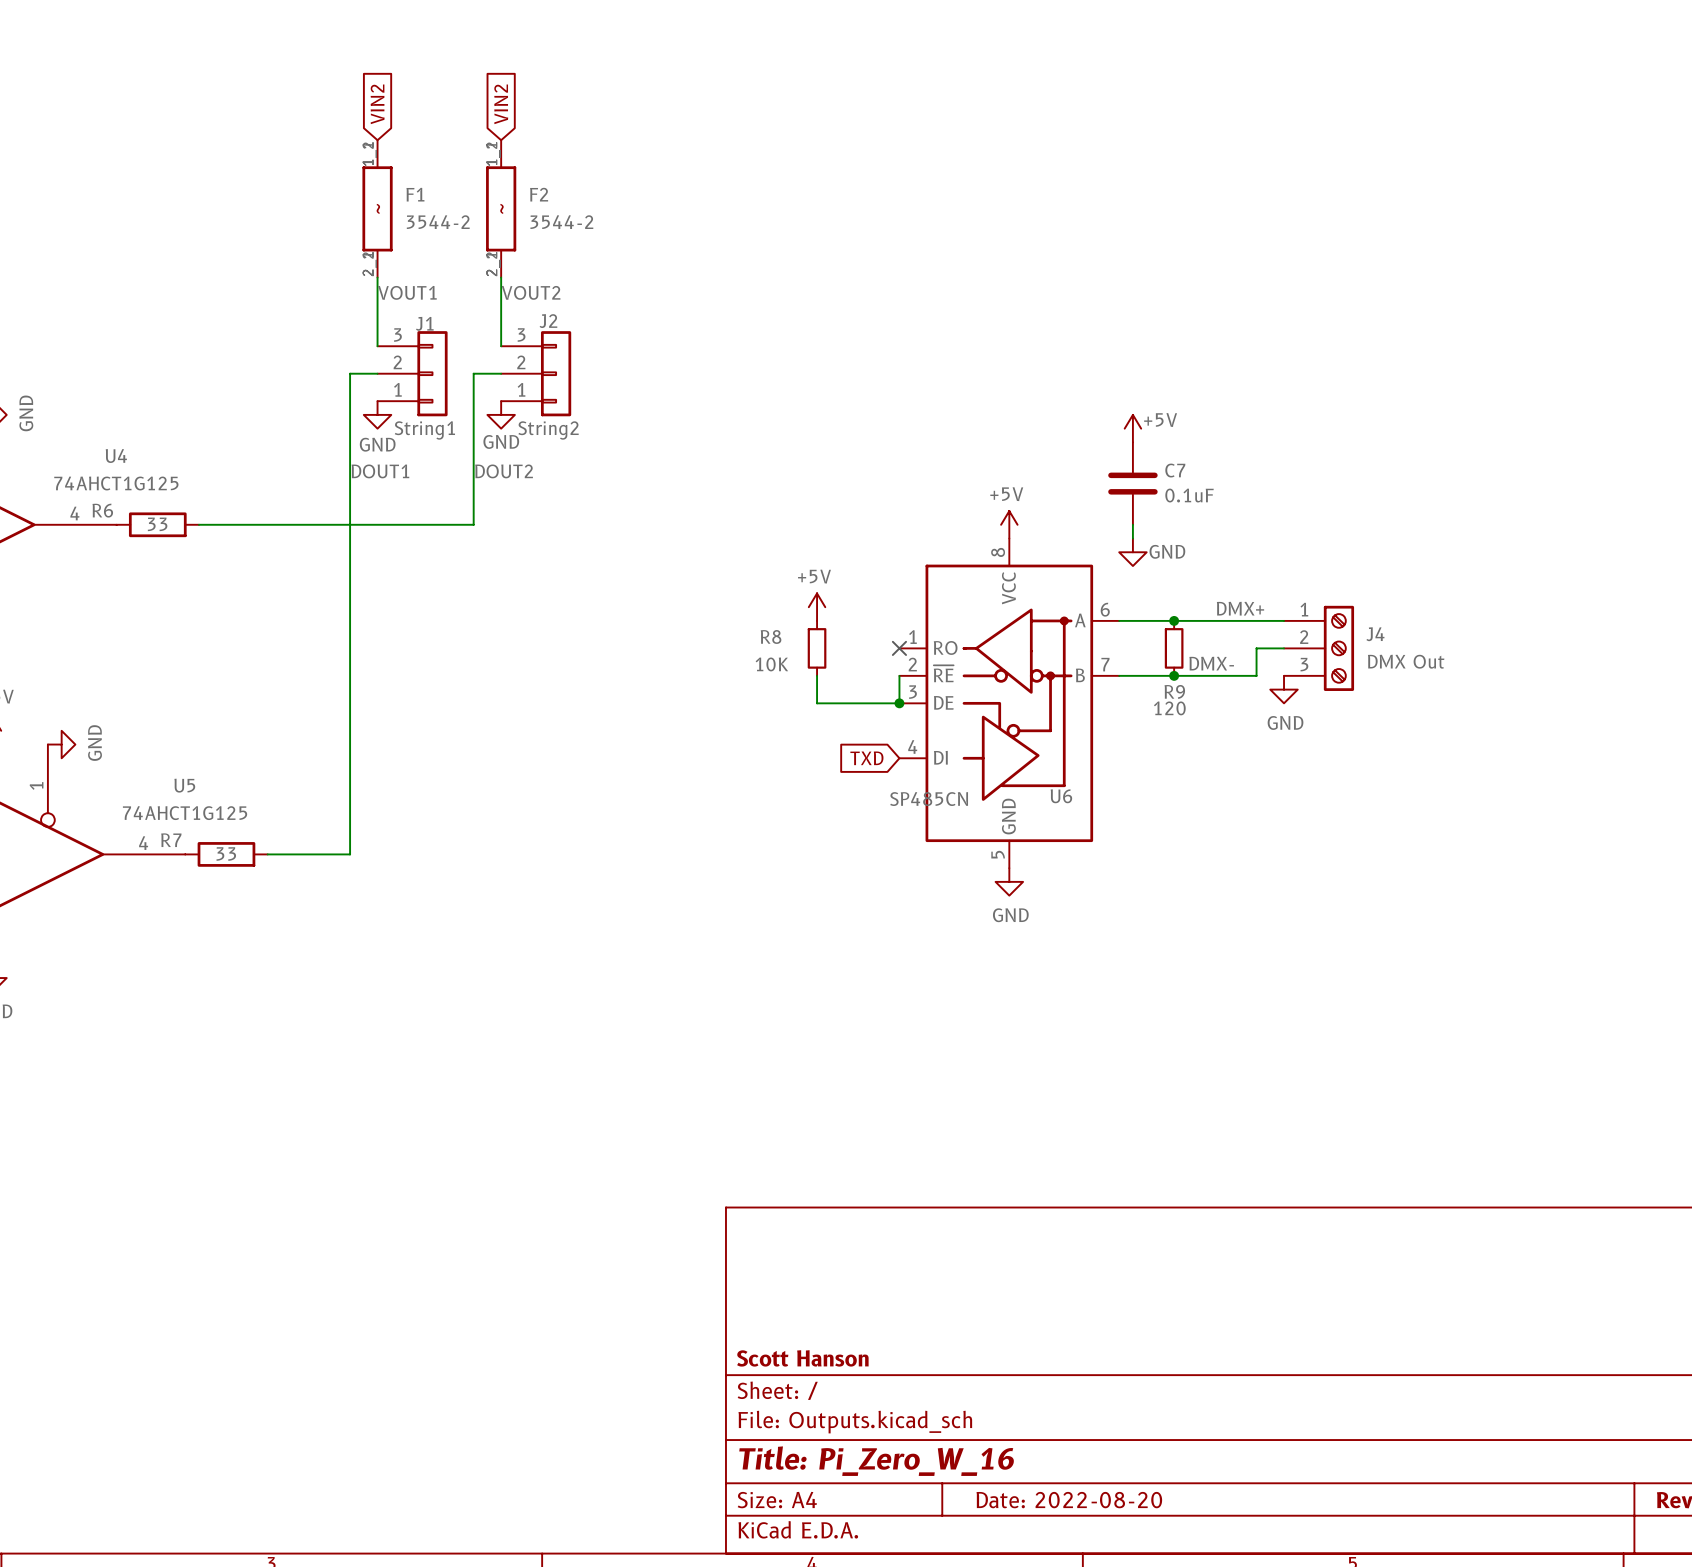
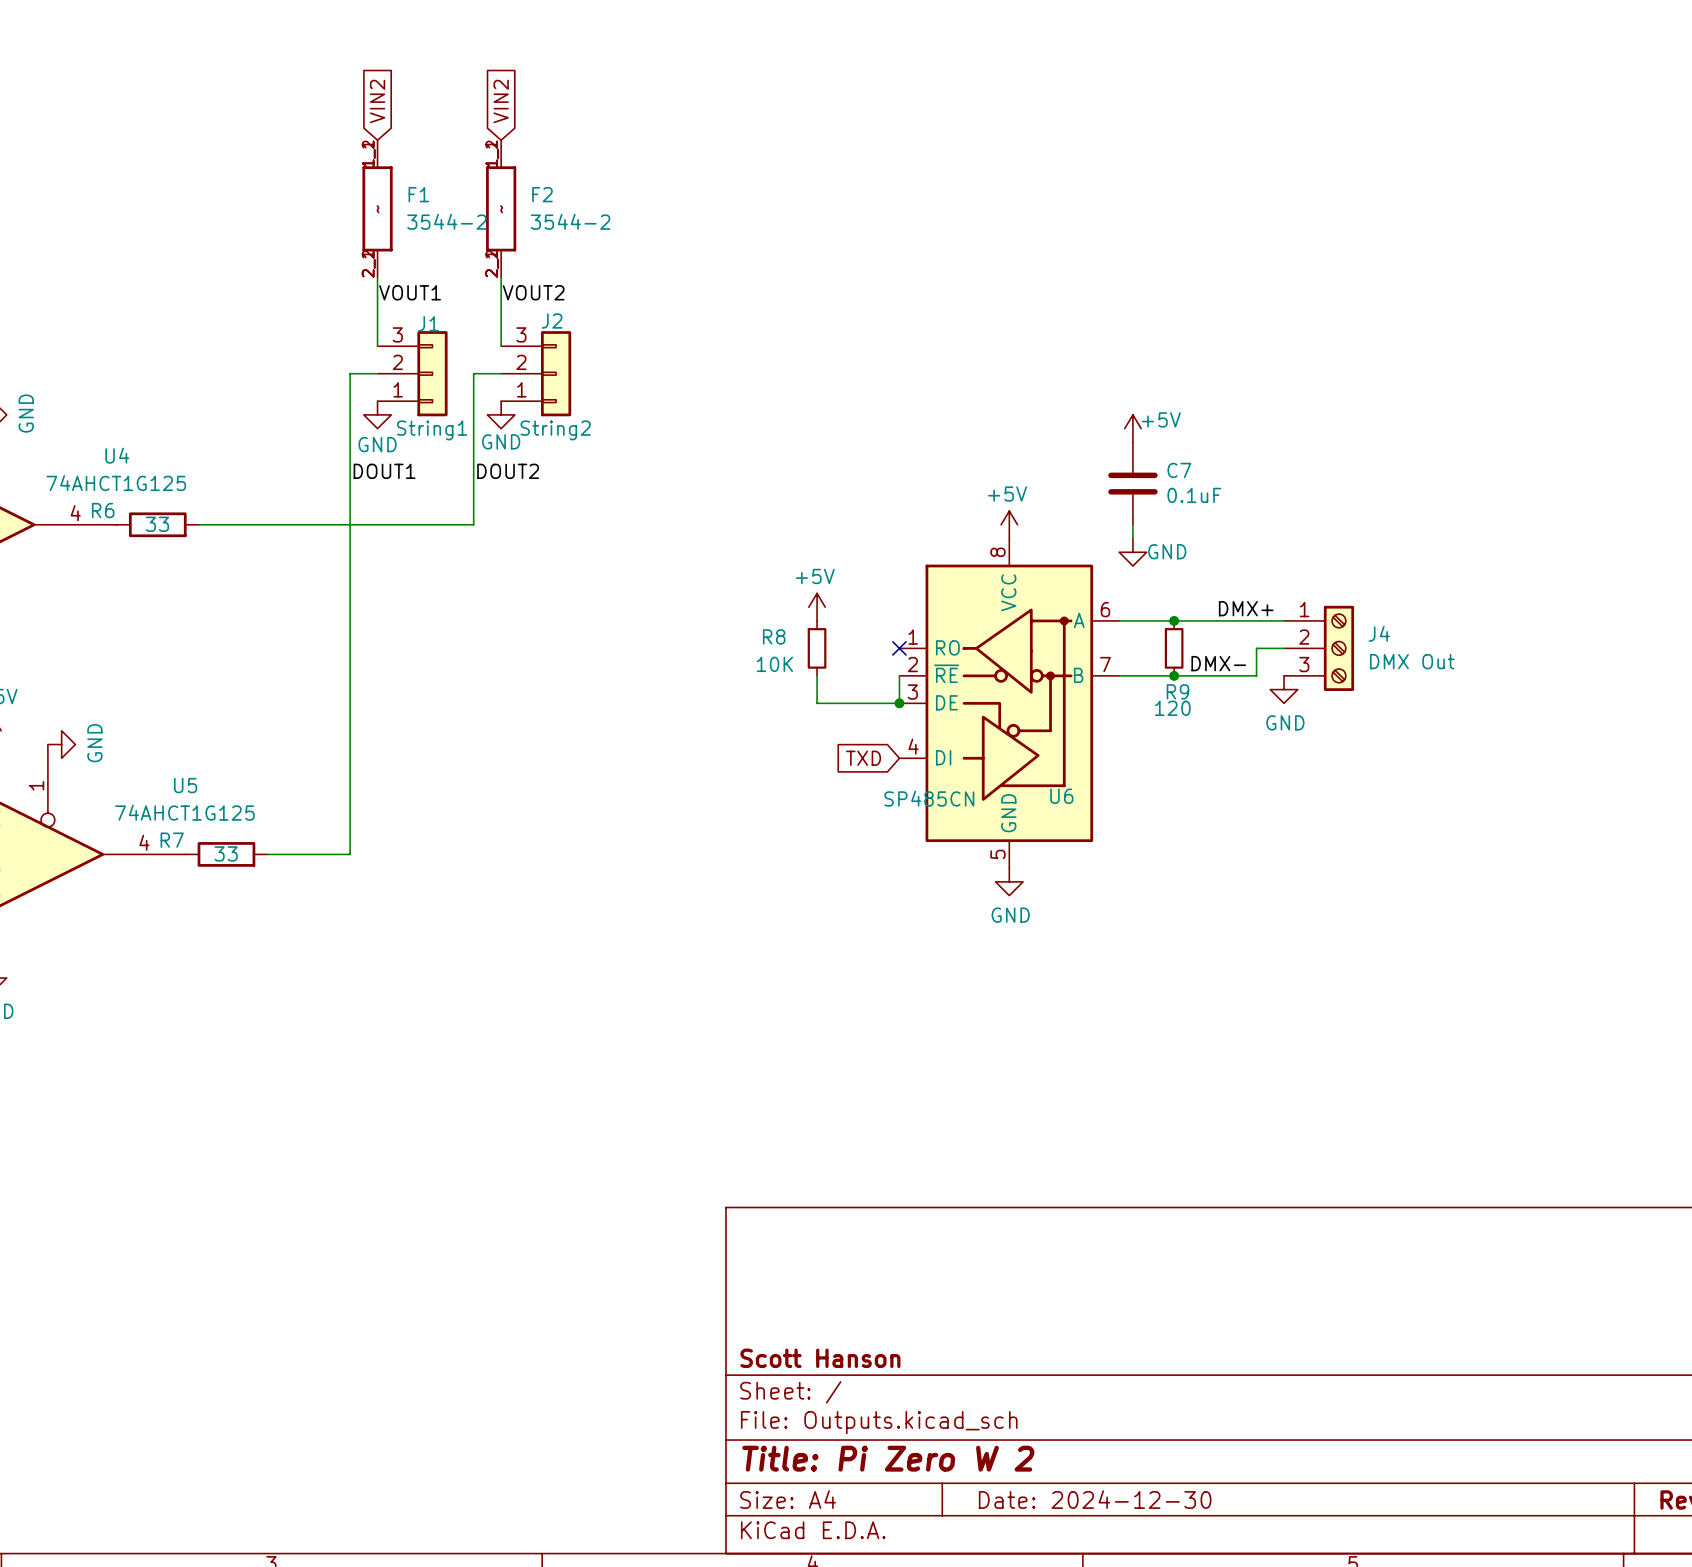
title block: Title: Pi_Zero_W_16 (876, 1461) -> Title: Pi Zero W 2 (888, 1458)
title block: Date: 2022-08-20 (1069, 1500) -> Date: 2024-12-30 (1095, 1499)

